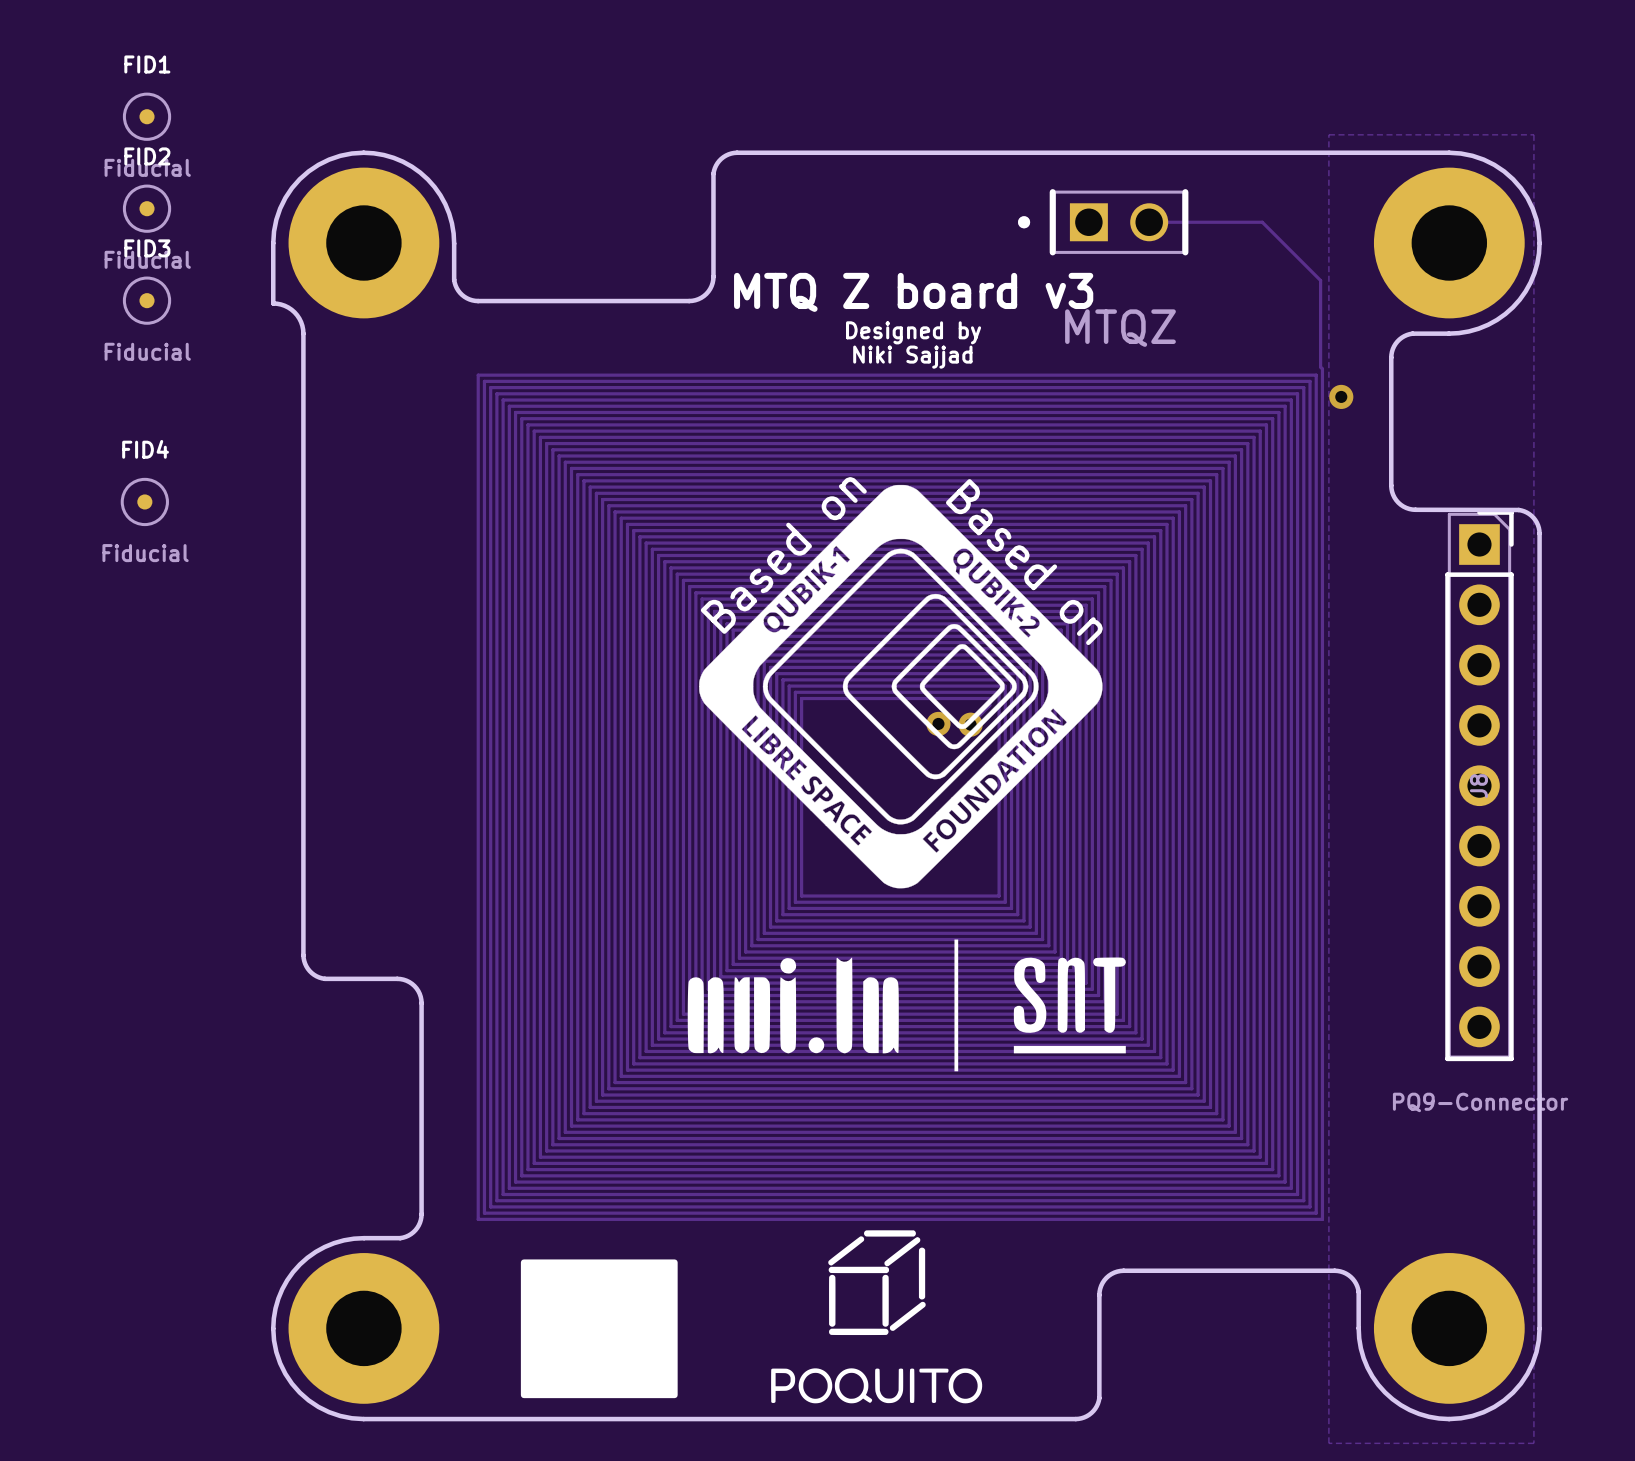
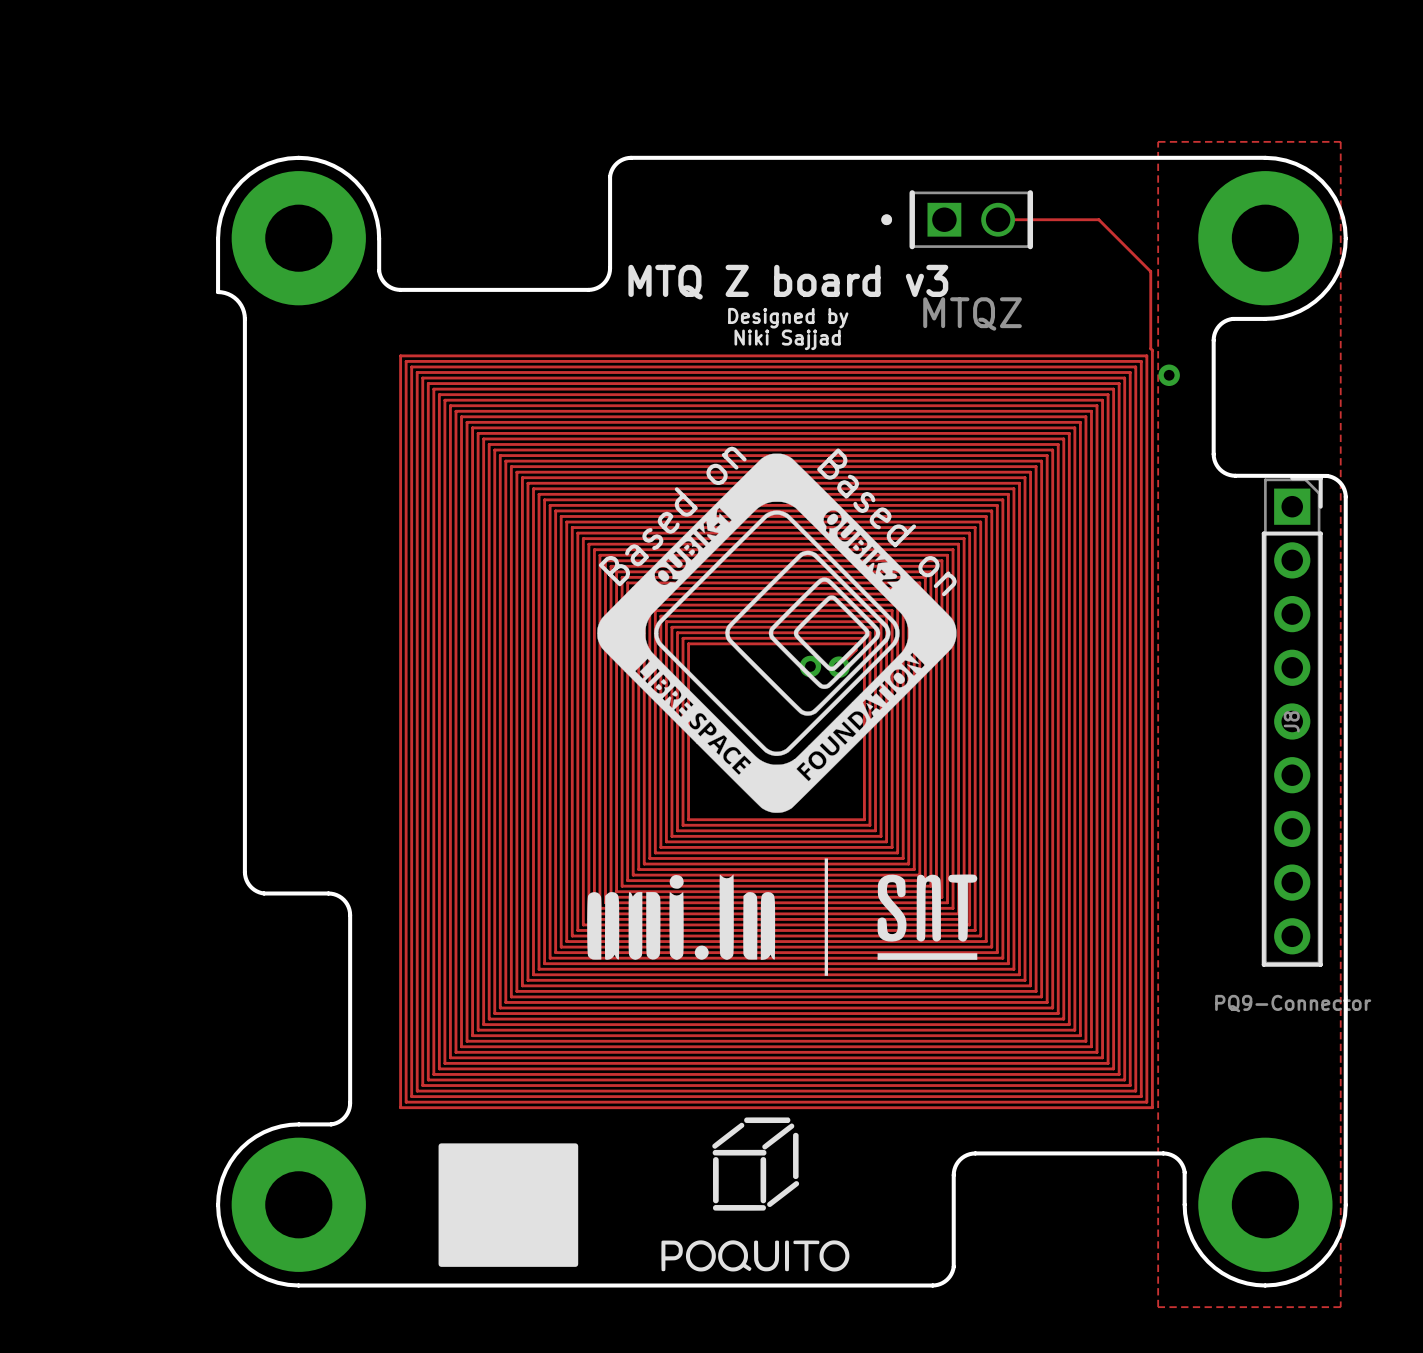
FID1: Fiducial (147, 116) -> none
FID2: Fiducial (147, 208) -> none
FID3: Fiducial (147, 300) -> none
FID4: Fiducial (144, 501) -> none

